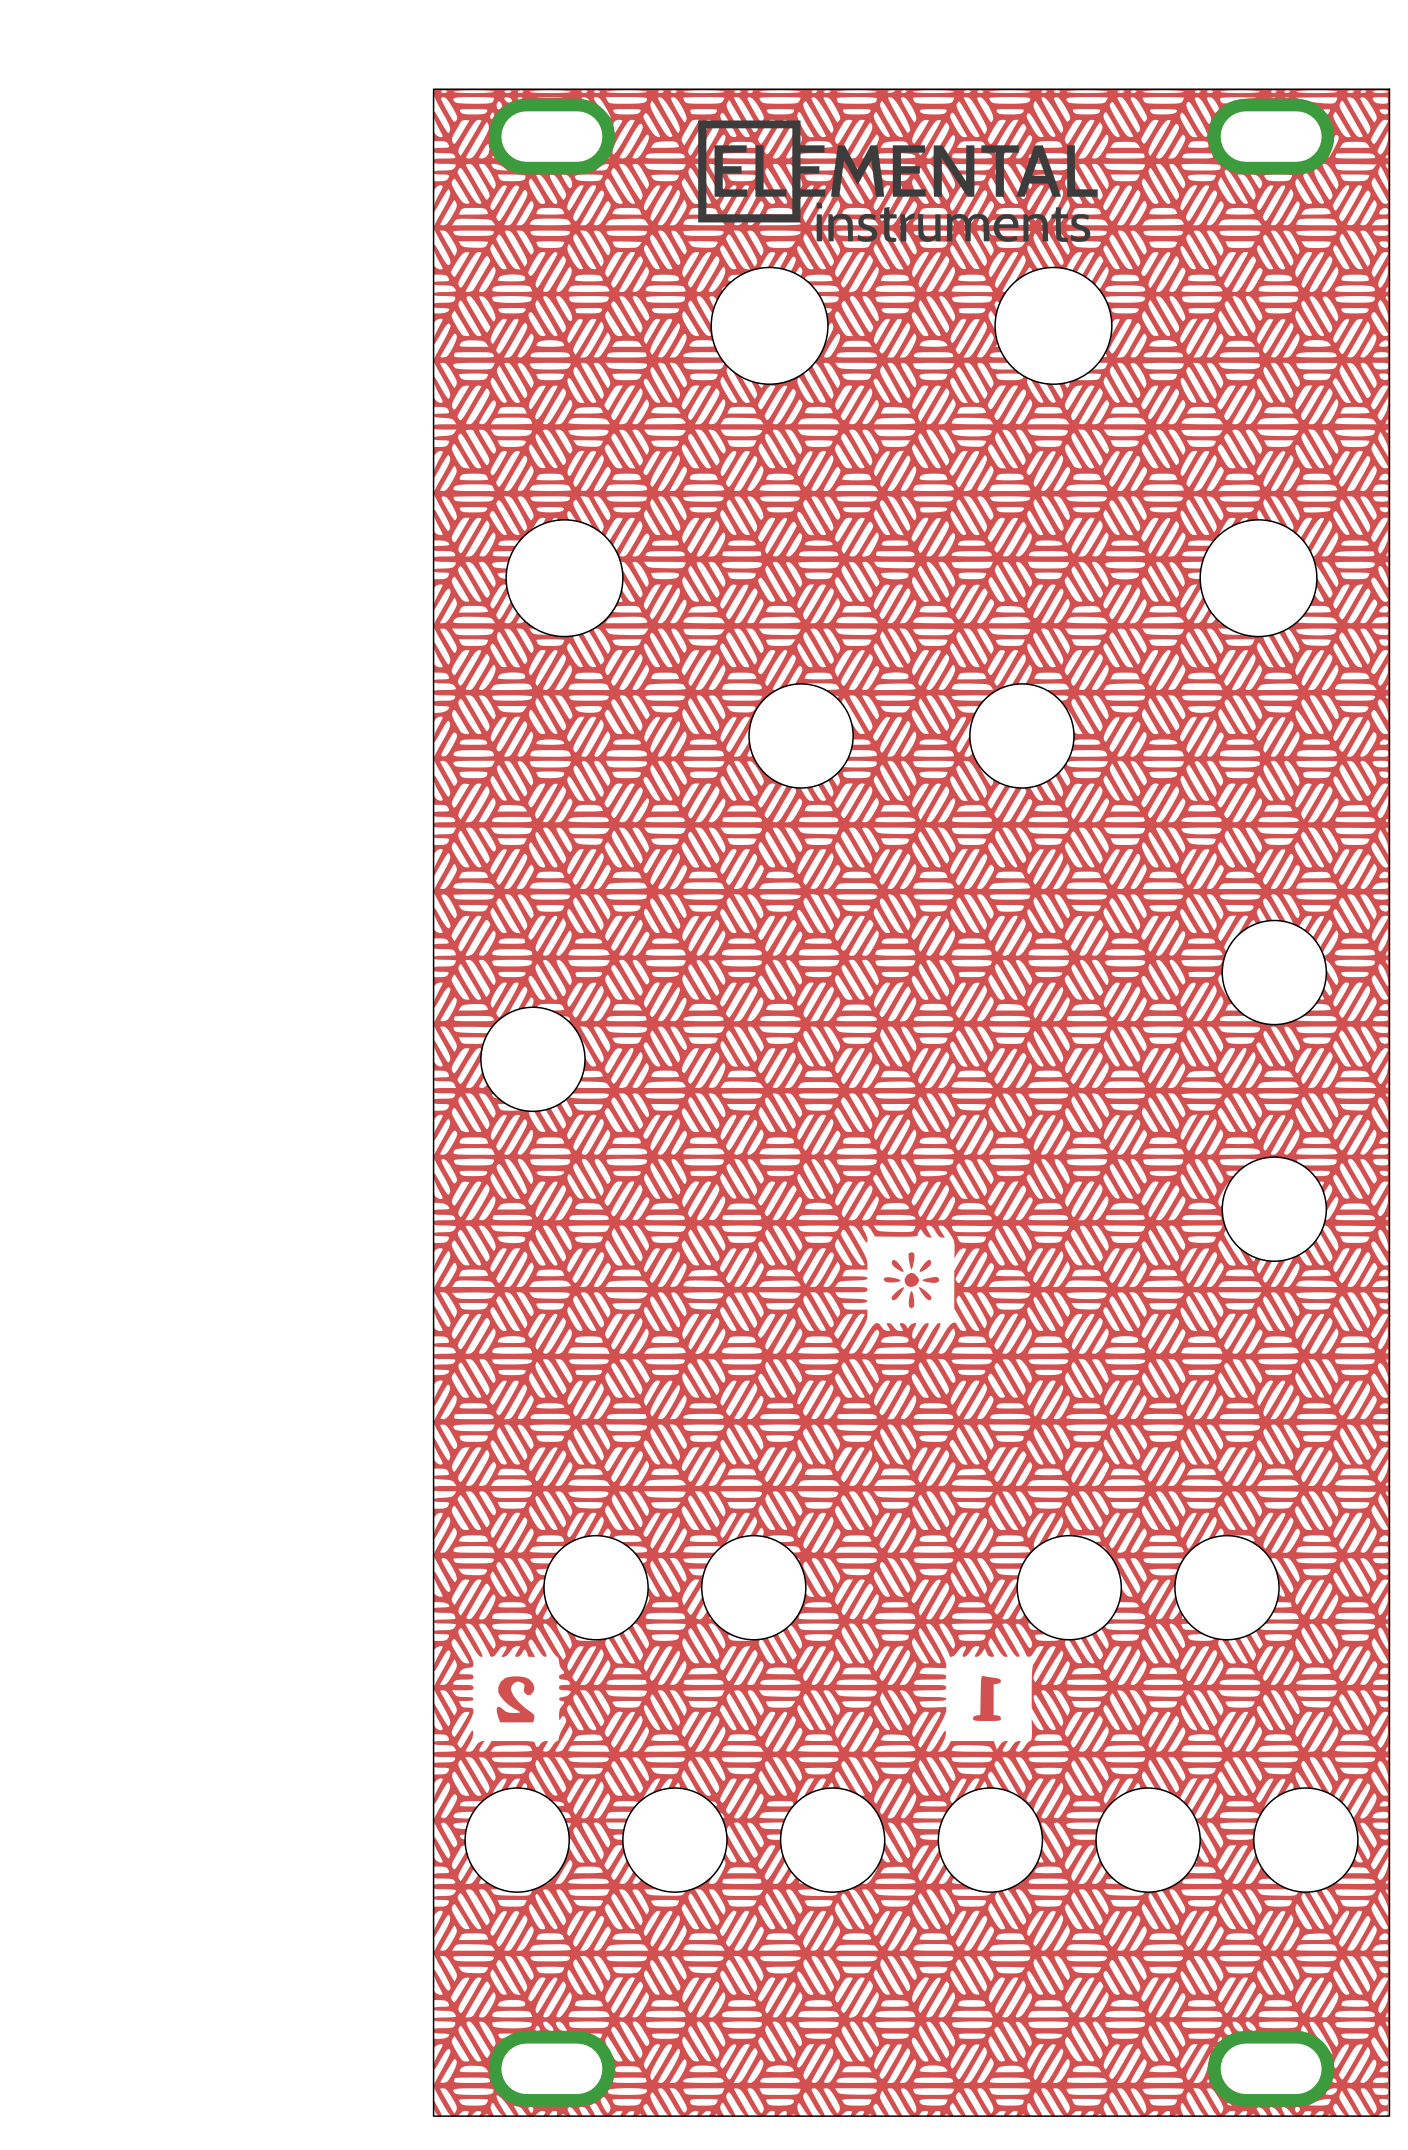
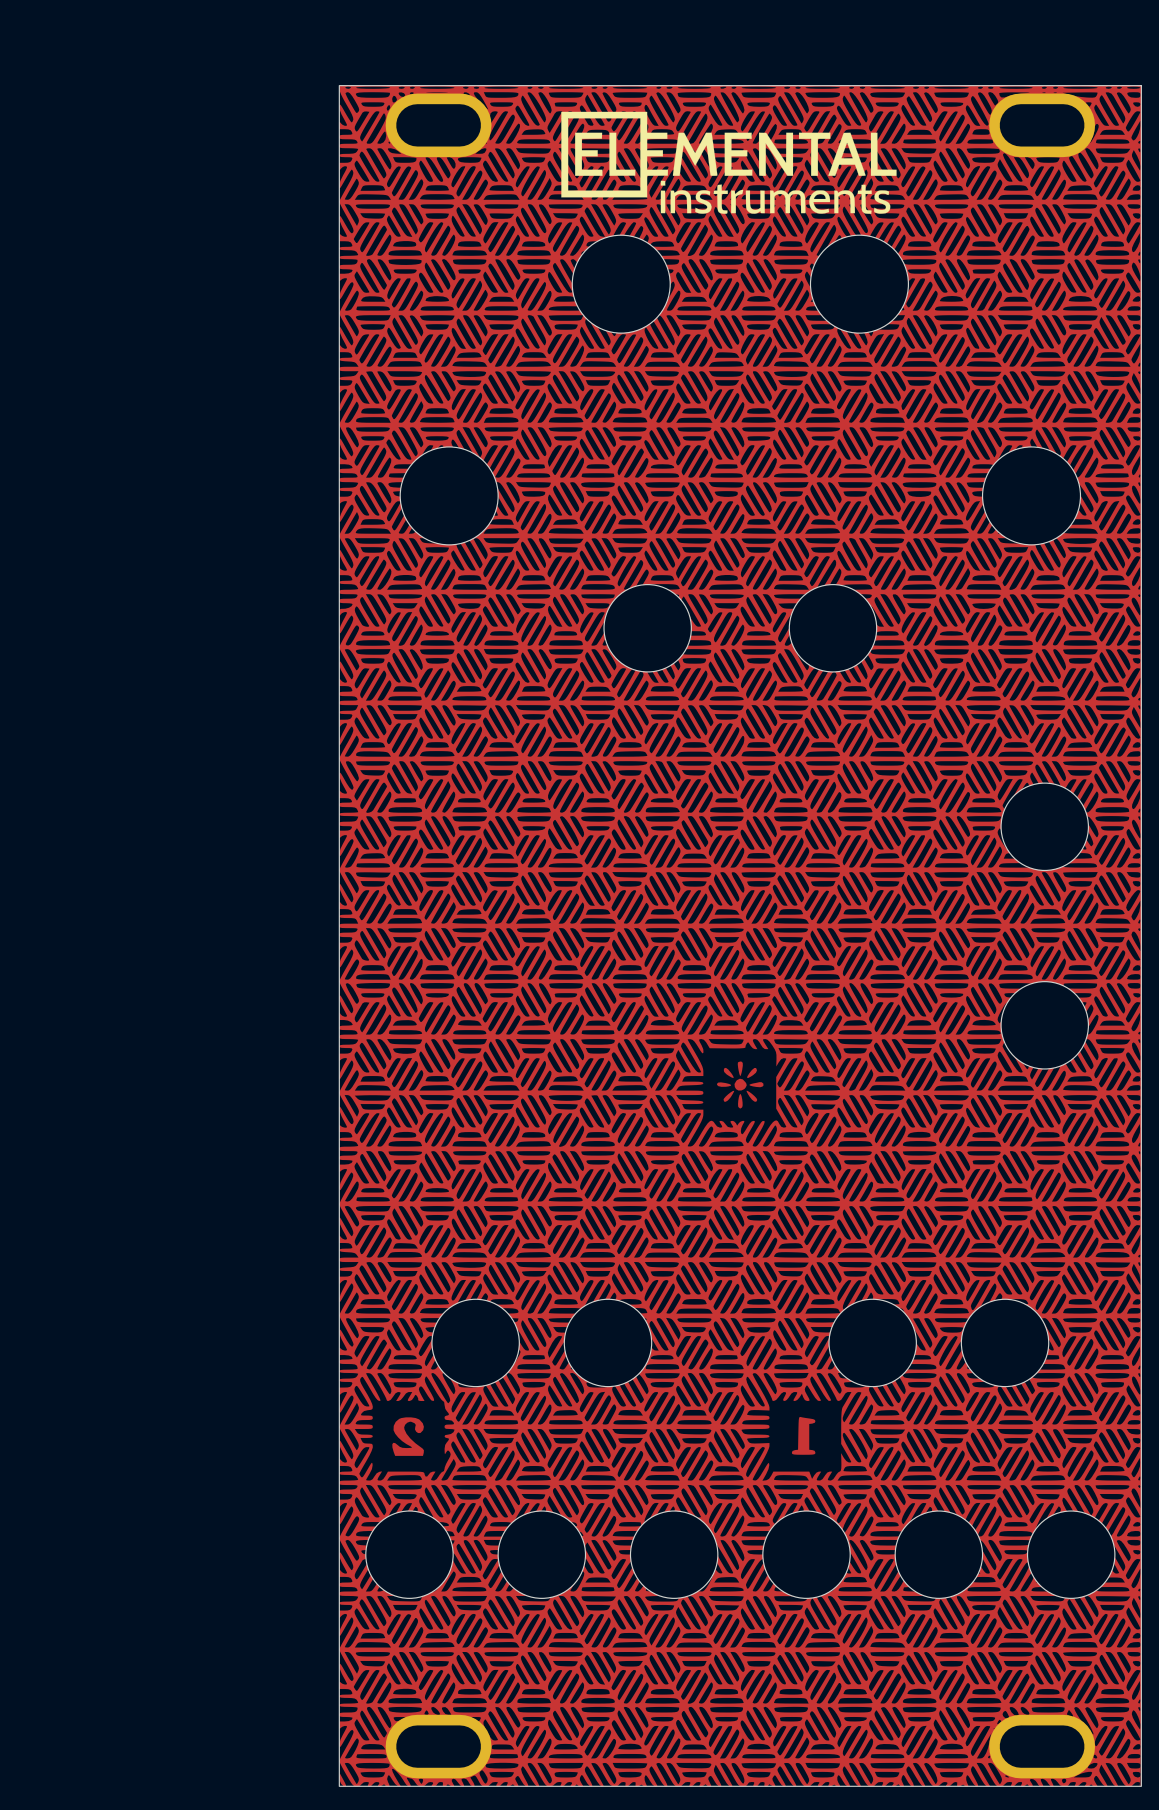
part: (532, 1059) -> none

